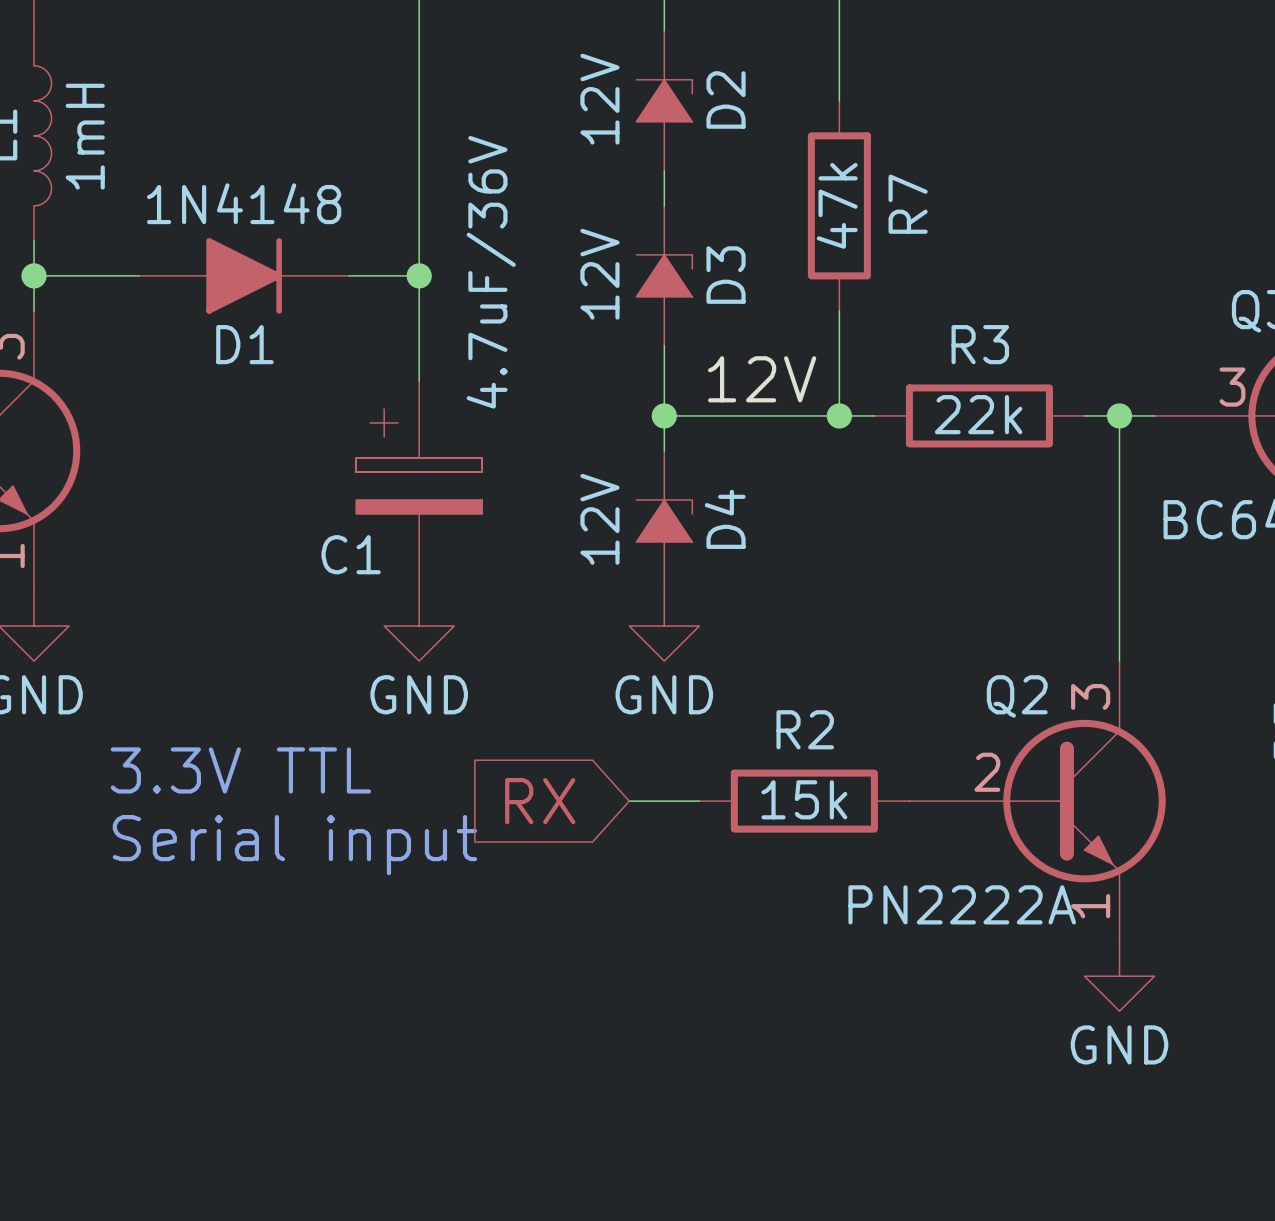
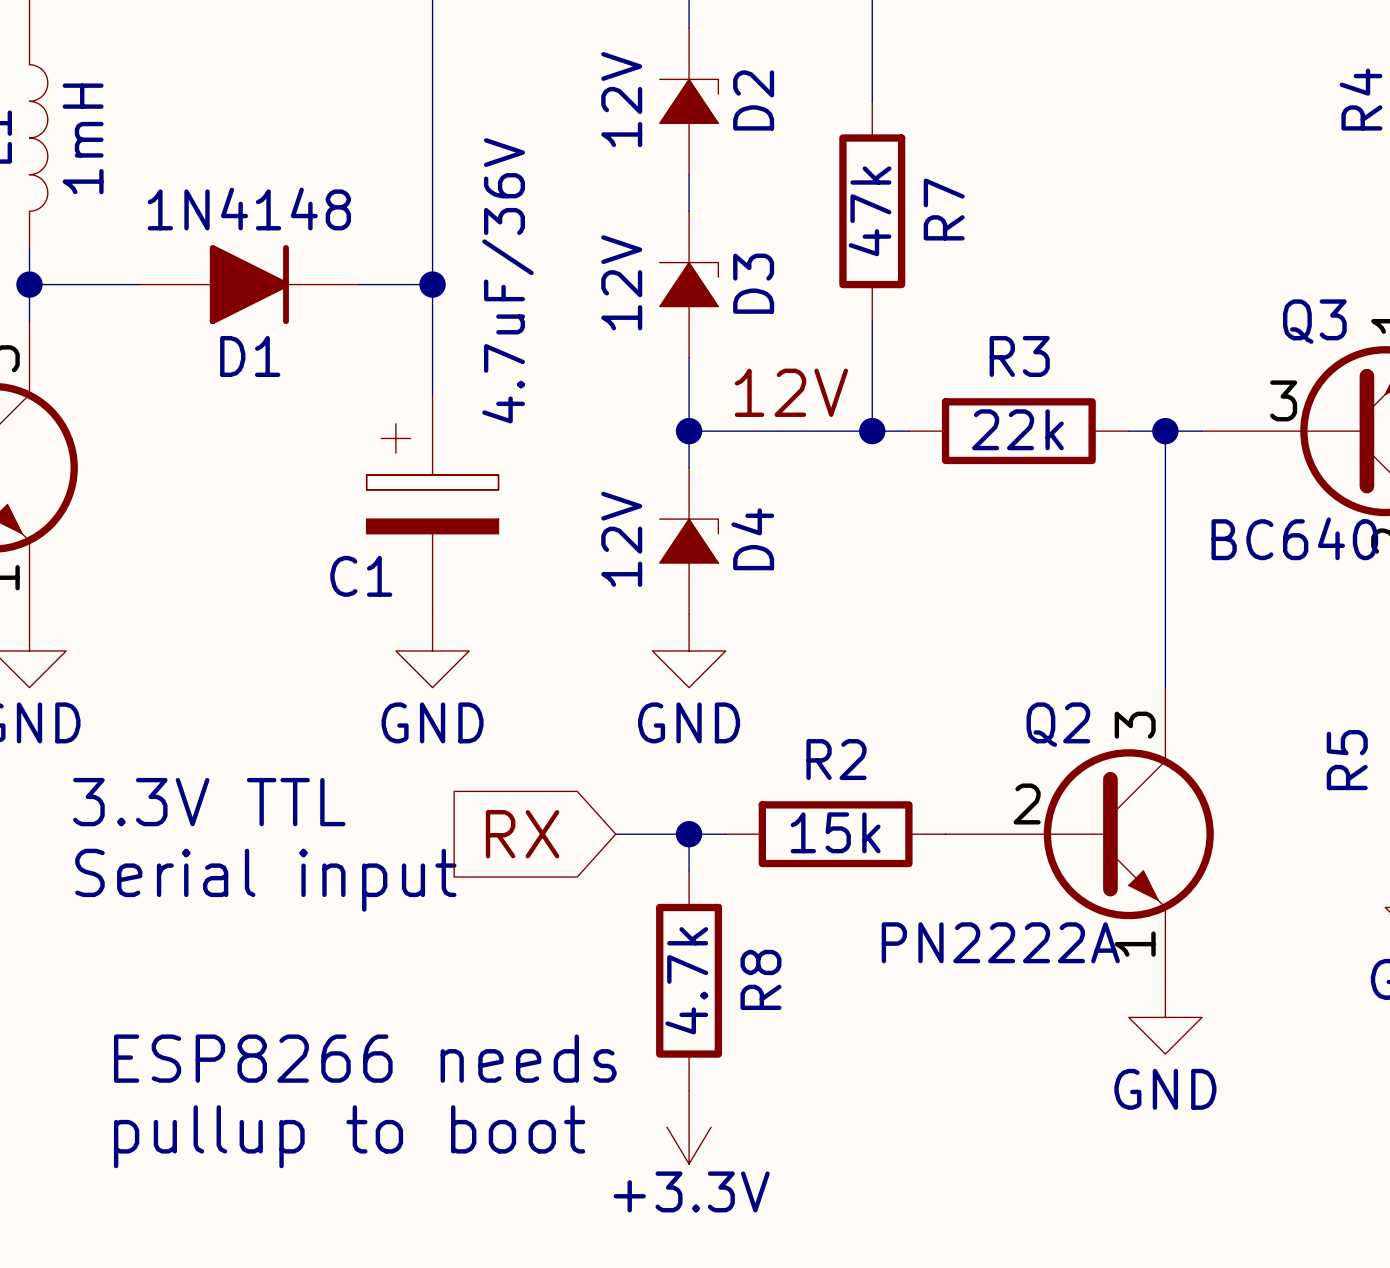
text position: 3.3V TTL (240, 770) -> 3.3V TTL (209, 802)
global label position: RX (540, 801) -> RX (522, 834)
wire: none -> (615, 834) (652, 834)
wire: none -> (689, 834) (689, 870)
junction: none -> (689, 834)
text position: Serial input (294, 845) -> Serial input (265, 880)
R8: none -> 4.7k (689, 980)
text: none -> ESP8266 needs (365, 1058)
power symbol: none -> +3.3V (689, 1127)
text: none -> pullup to boot (349, 1136)

